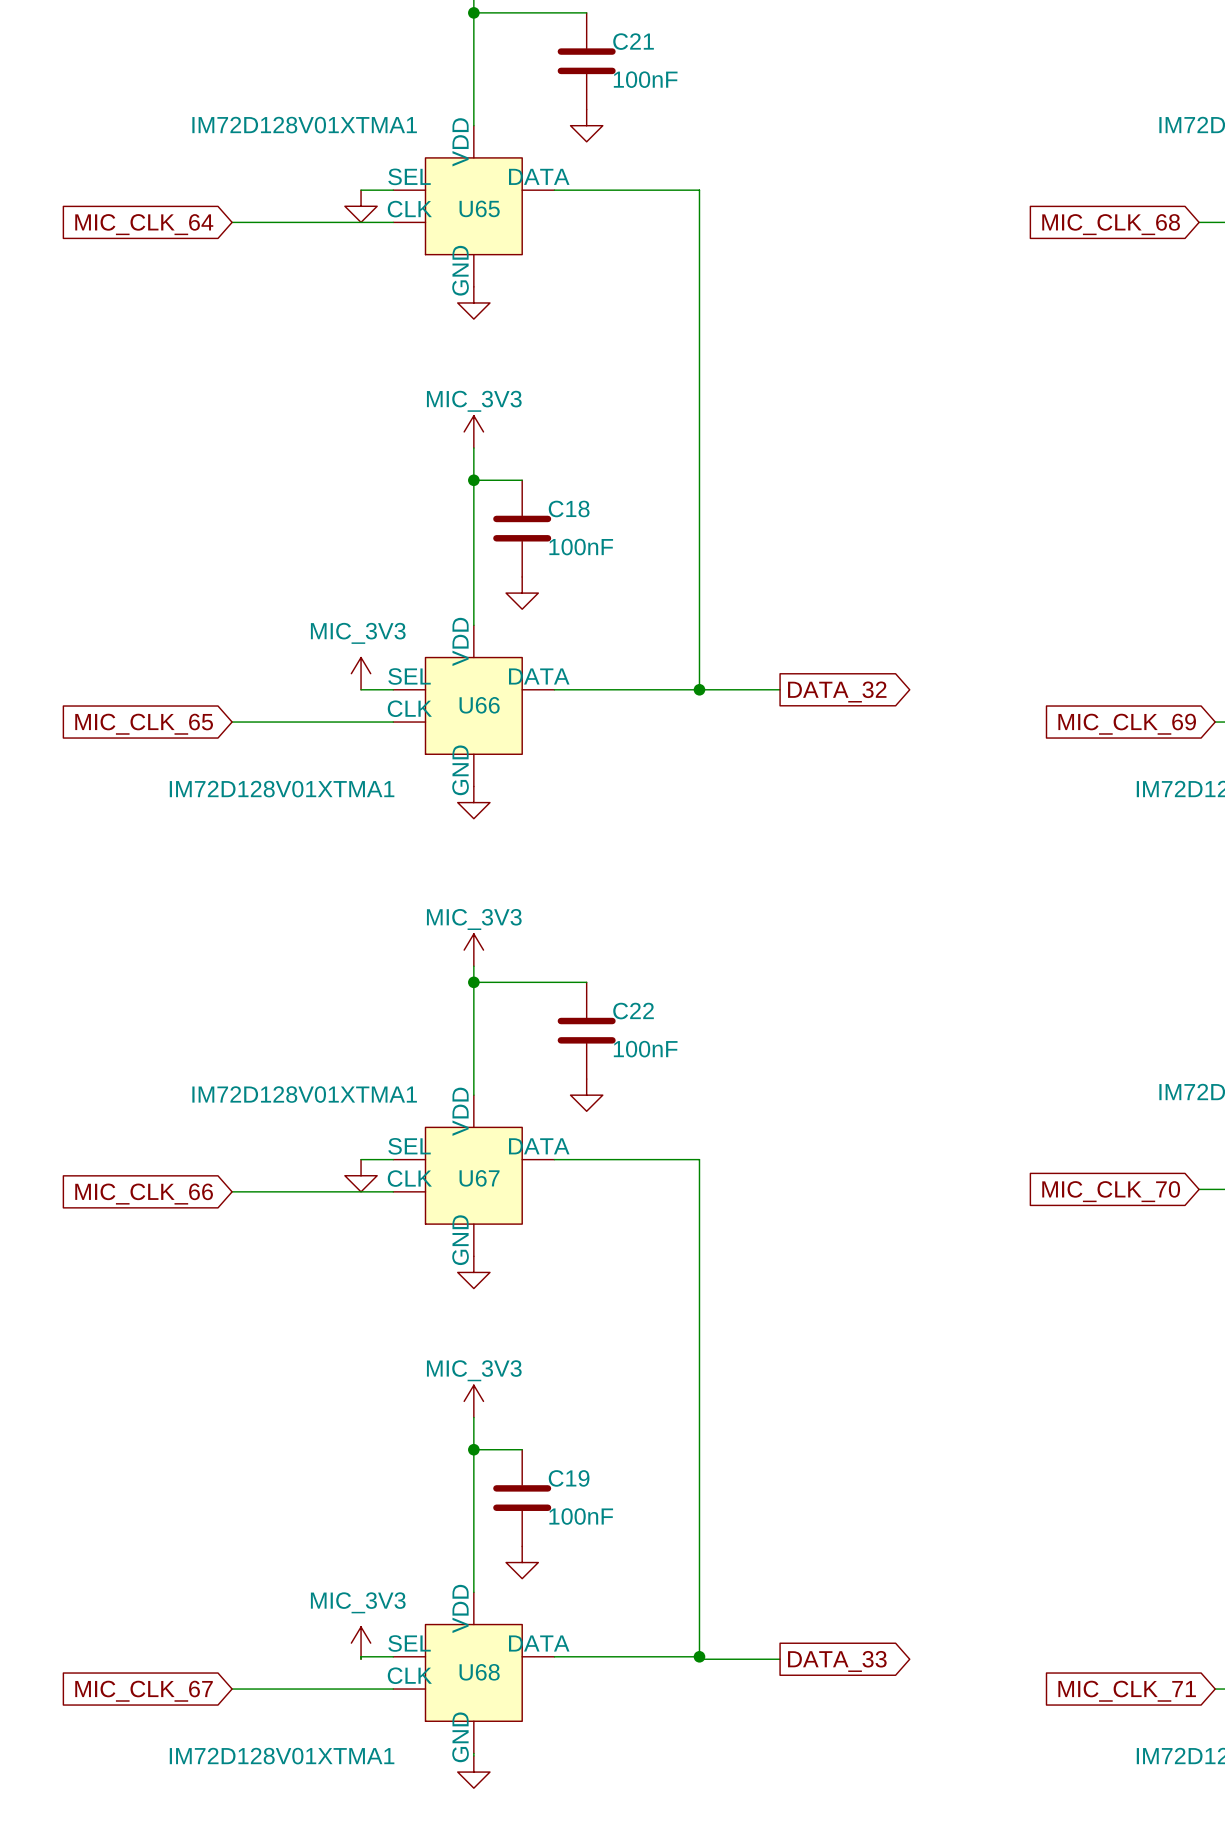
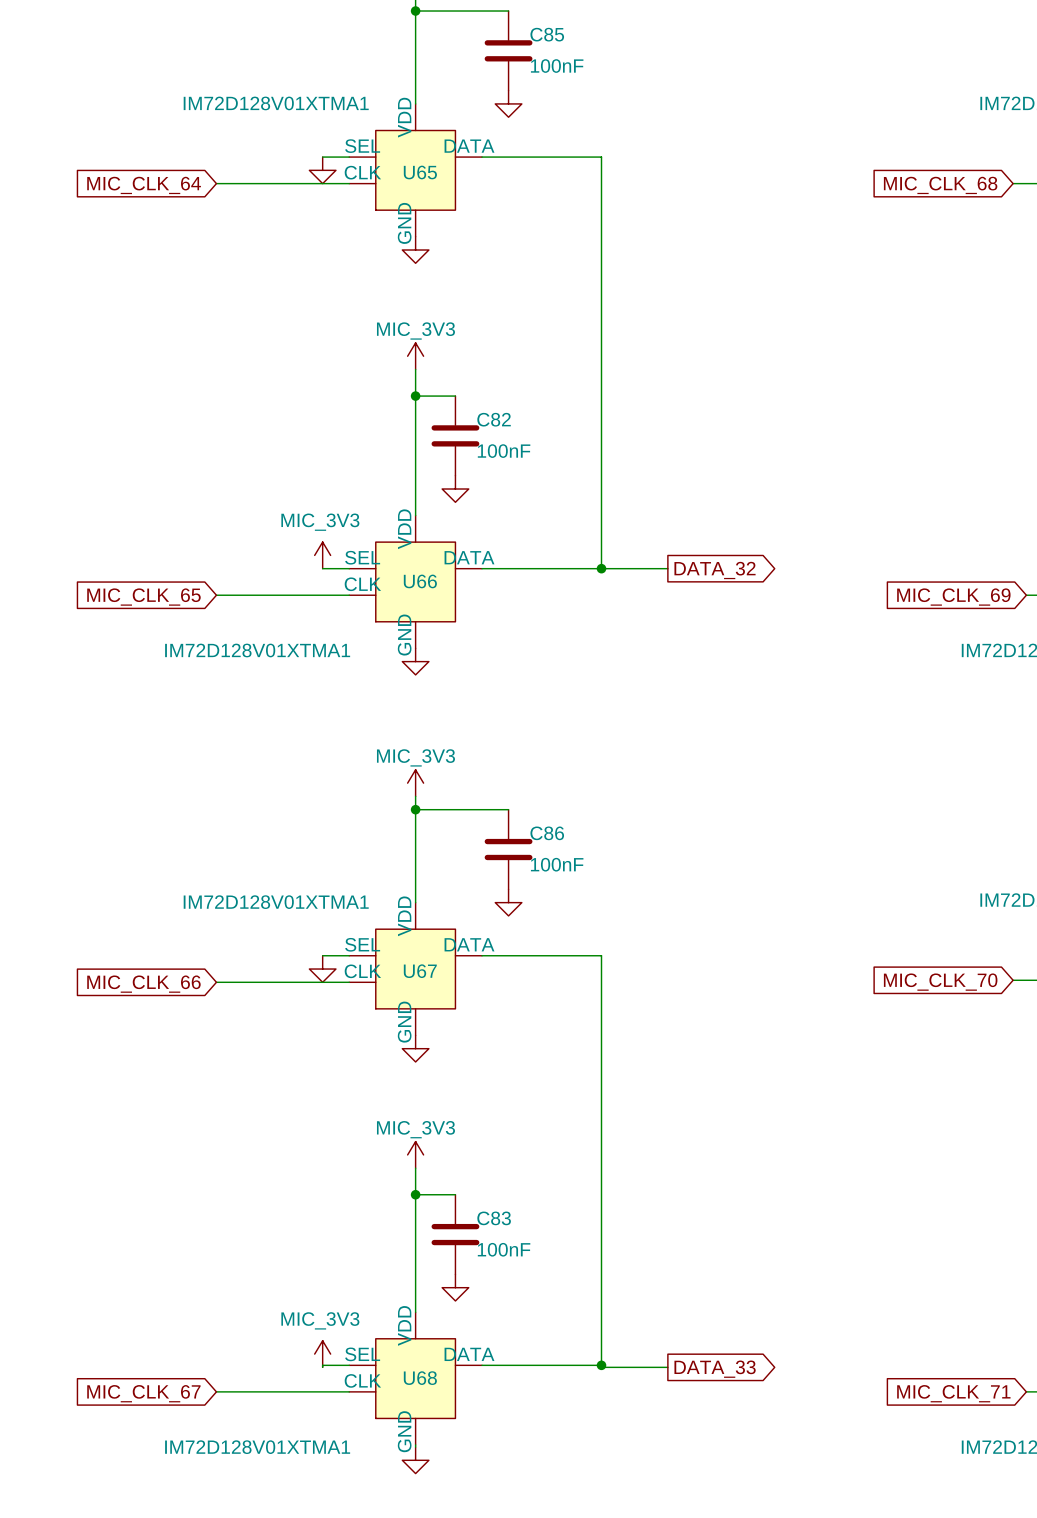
C21 name: C21 (633, 41) -> C85 (547, 34)
C18 name: C18 (569, 508) -> C82 (494, 419)
C22 name: C22 (633, 1011) -> C86 (547, 833)
C19 name: C19 (569, 1478) -> C83 (494, 1218)

